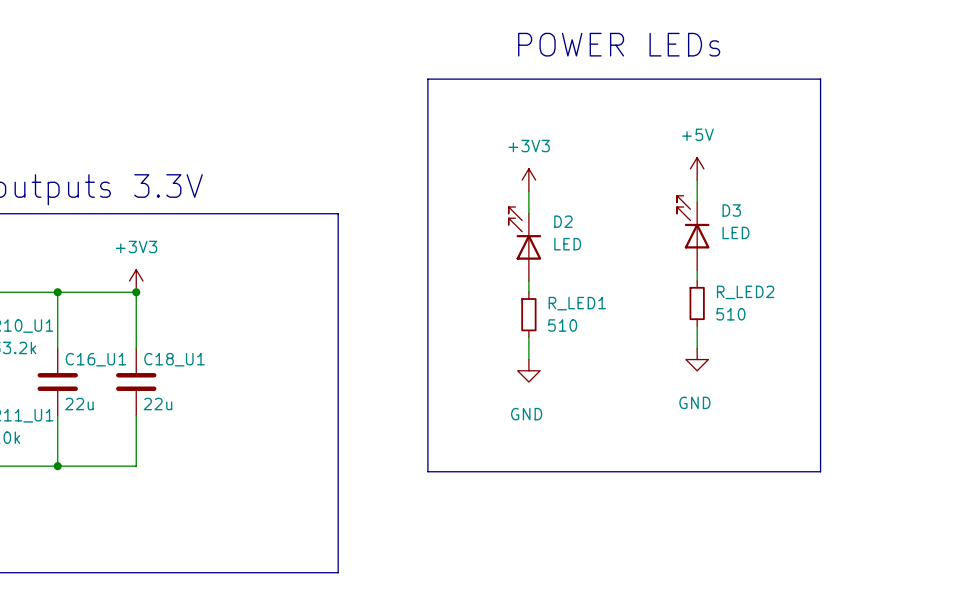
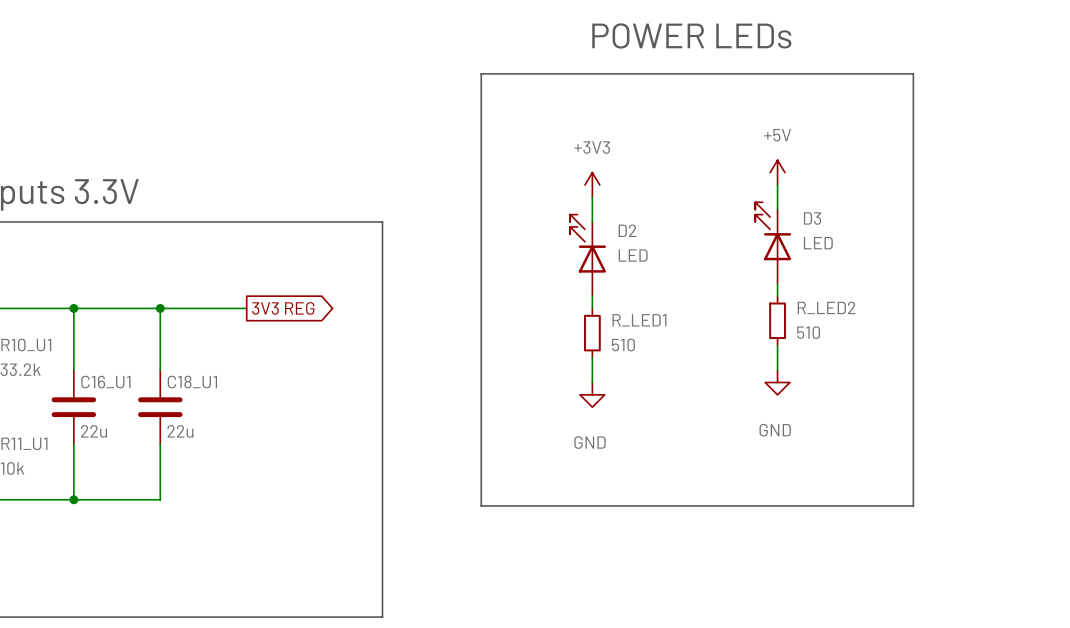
power symbol: +3V3 (136, 281) -> none
wire: none -> (160, 308) (246, 308)
global label: none -> 3V3 REG (283, 308)

